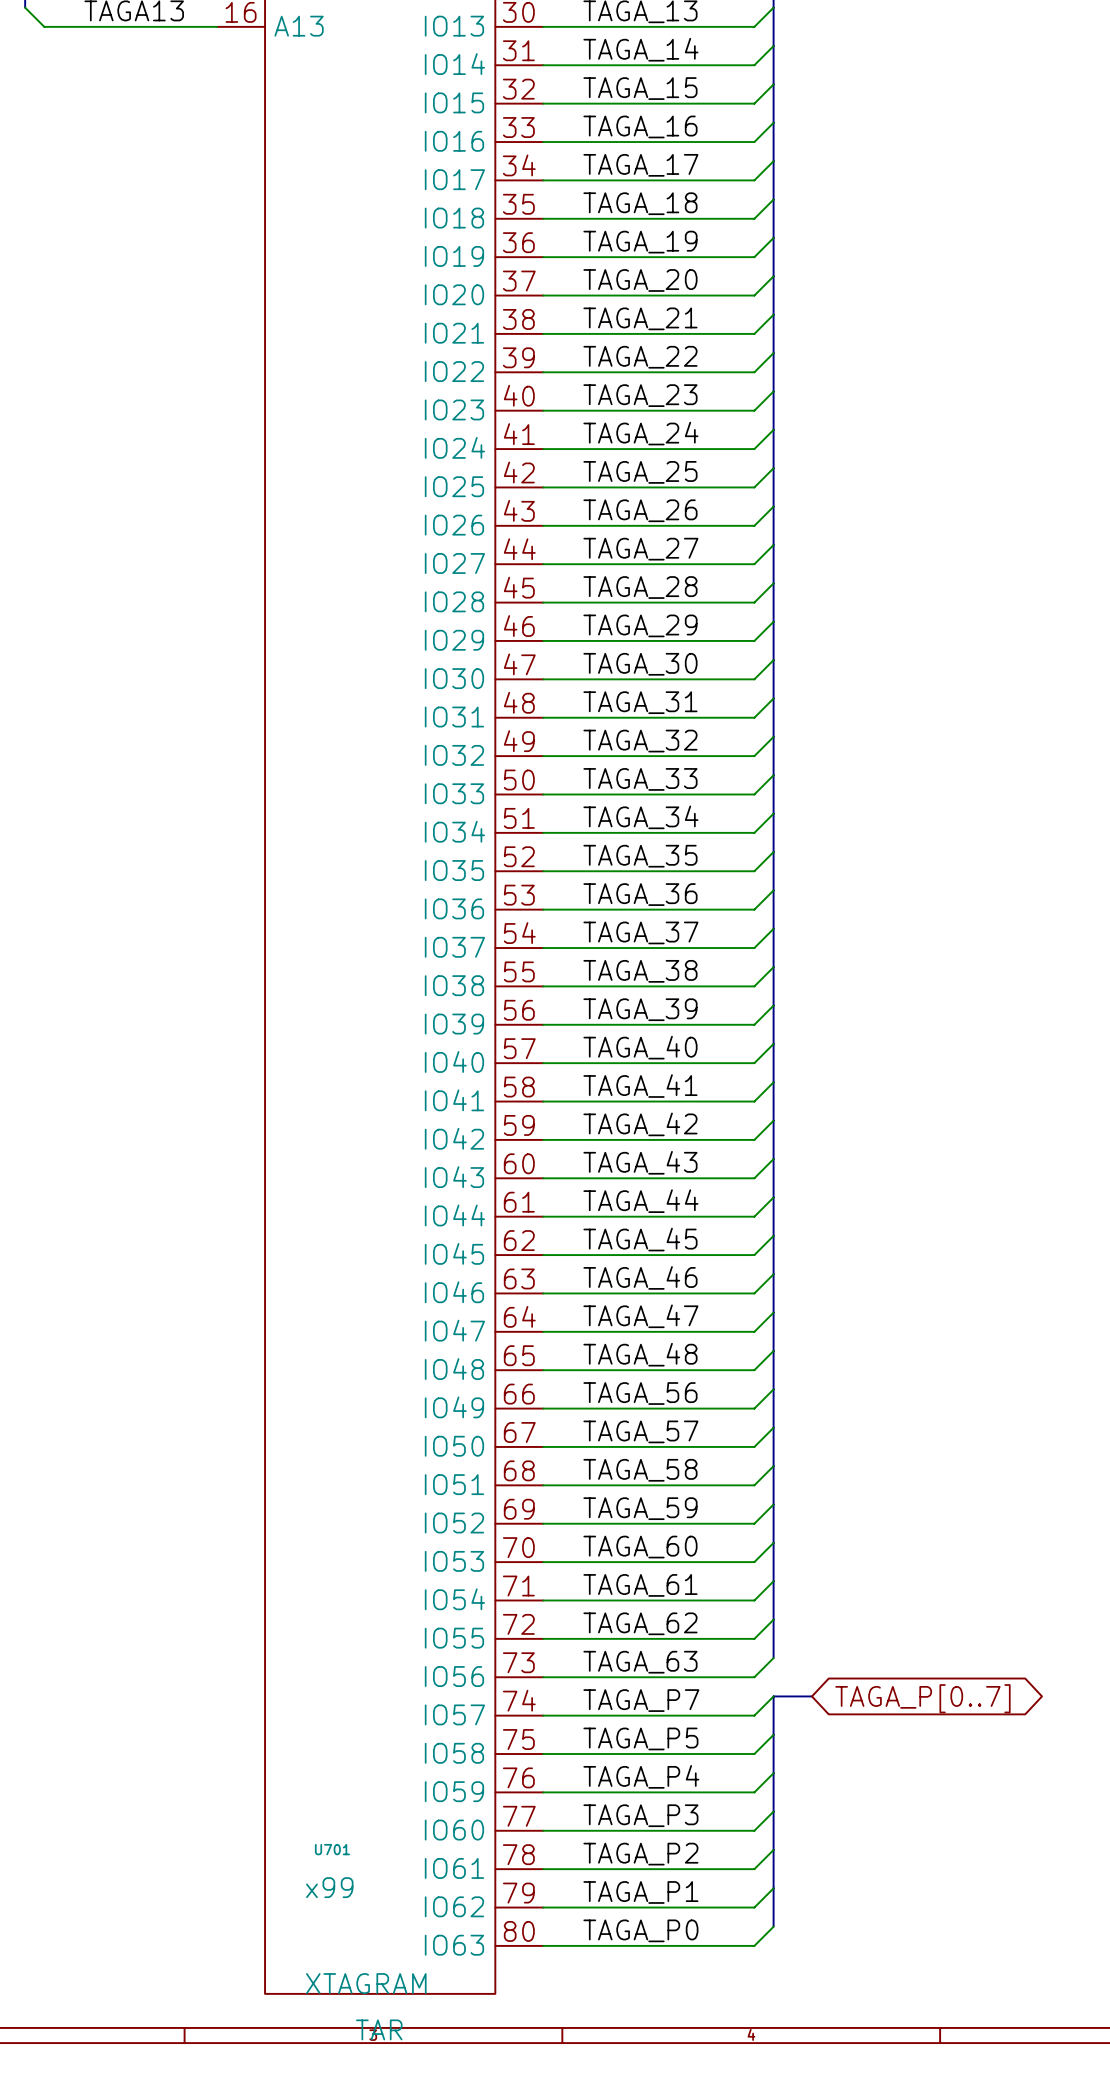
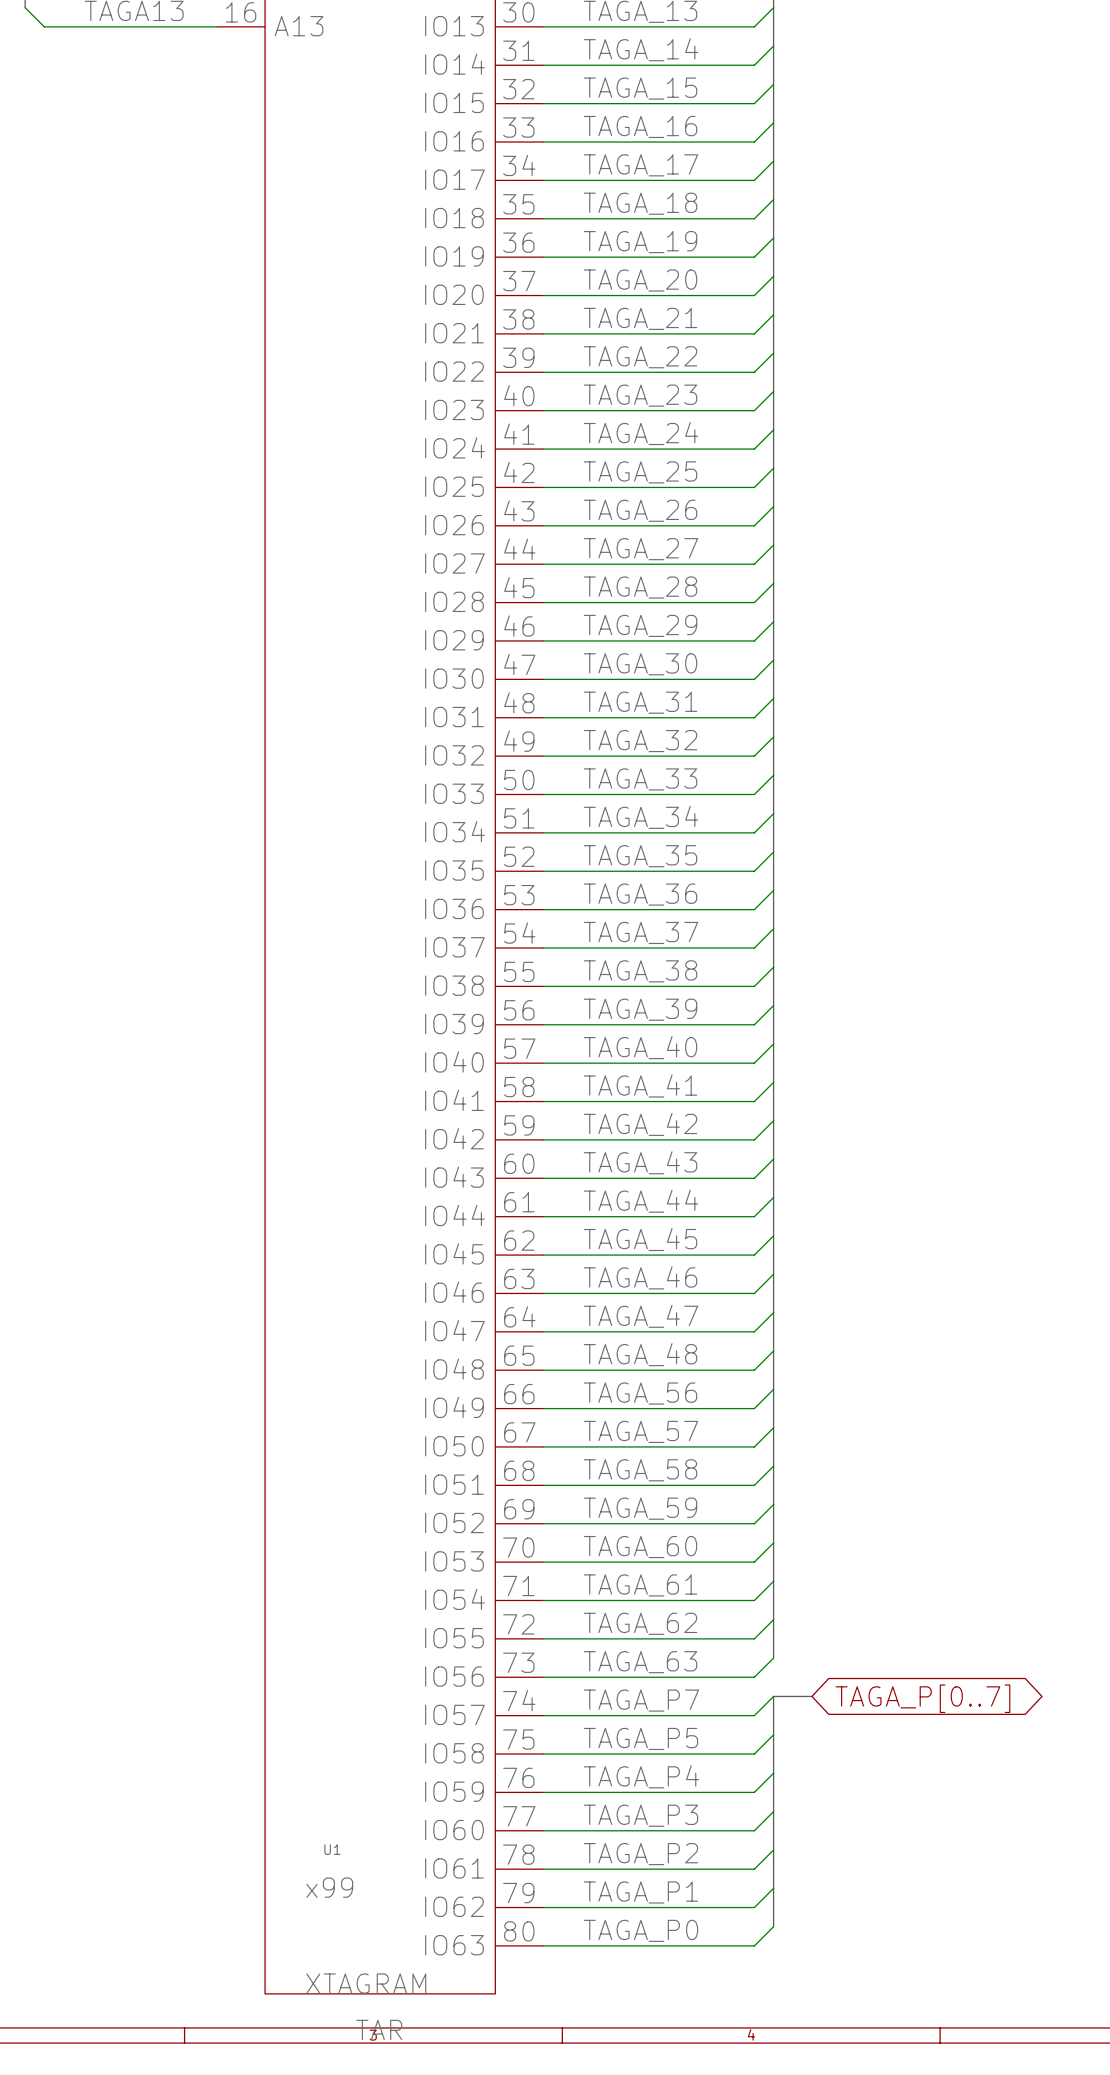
U701 name: U701 (332, 1849) -> U1 (332, 1849)

